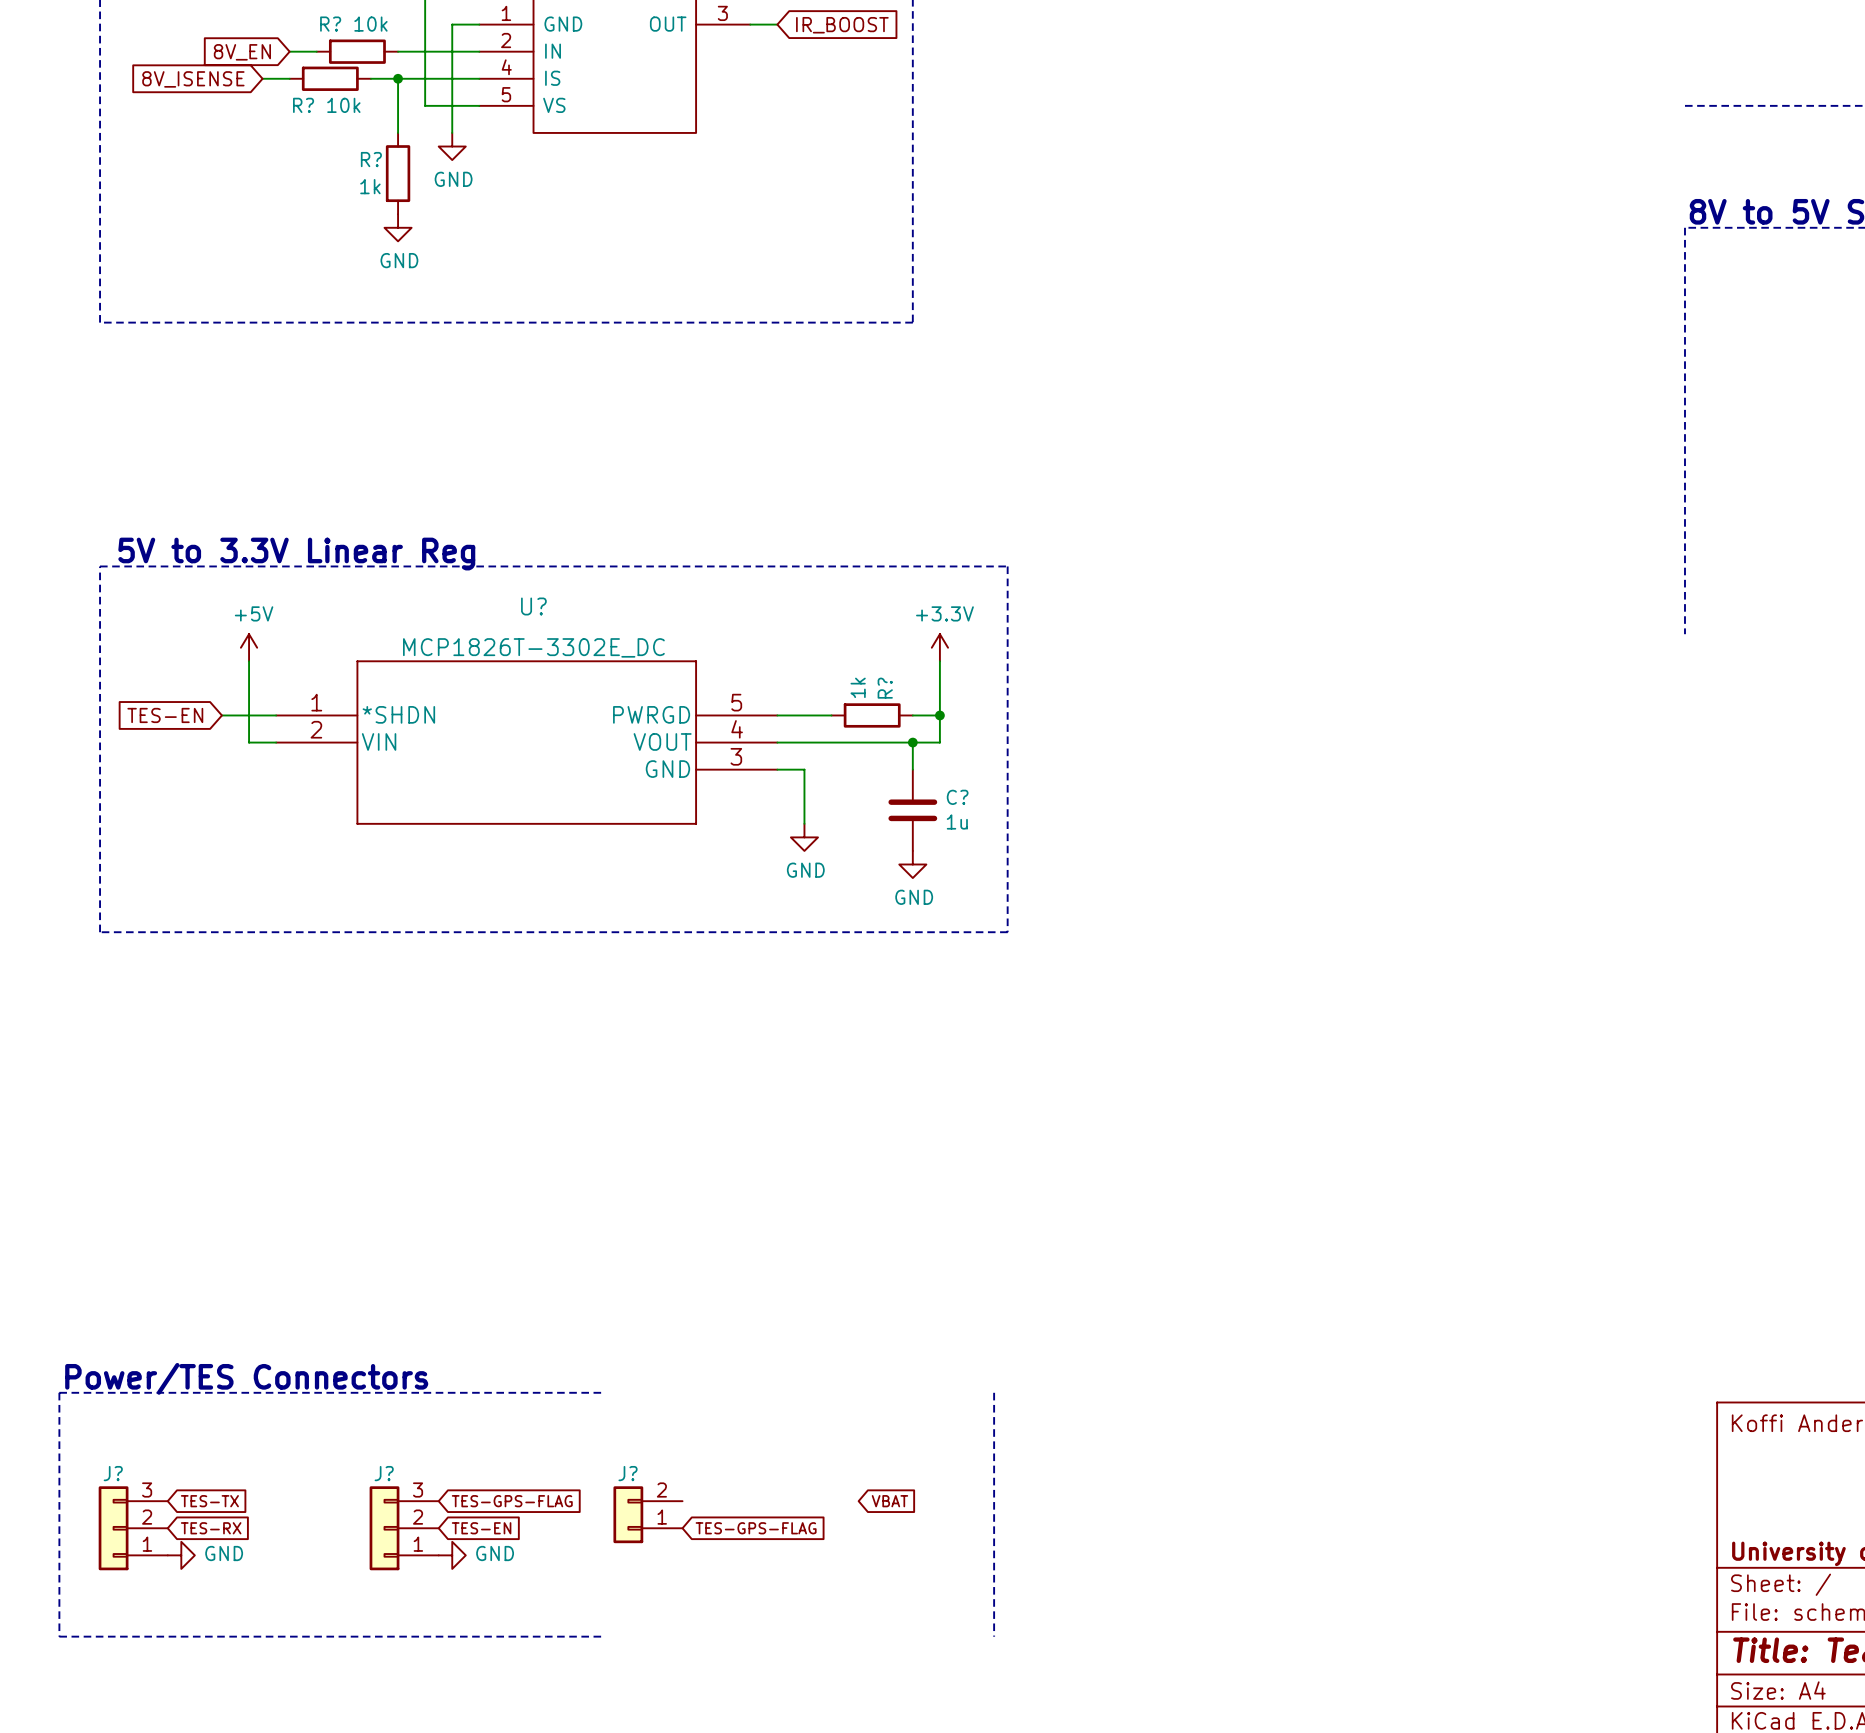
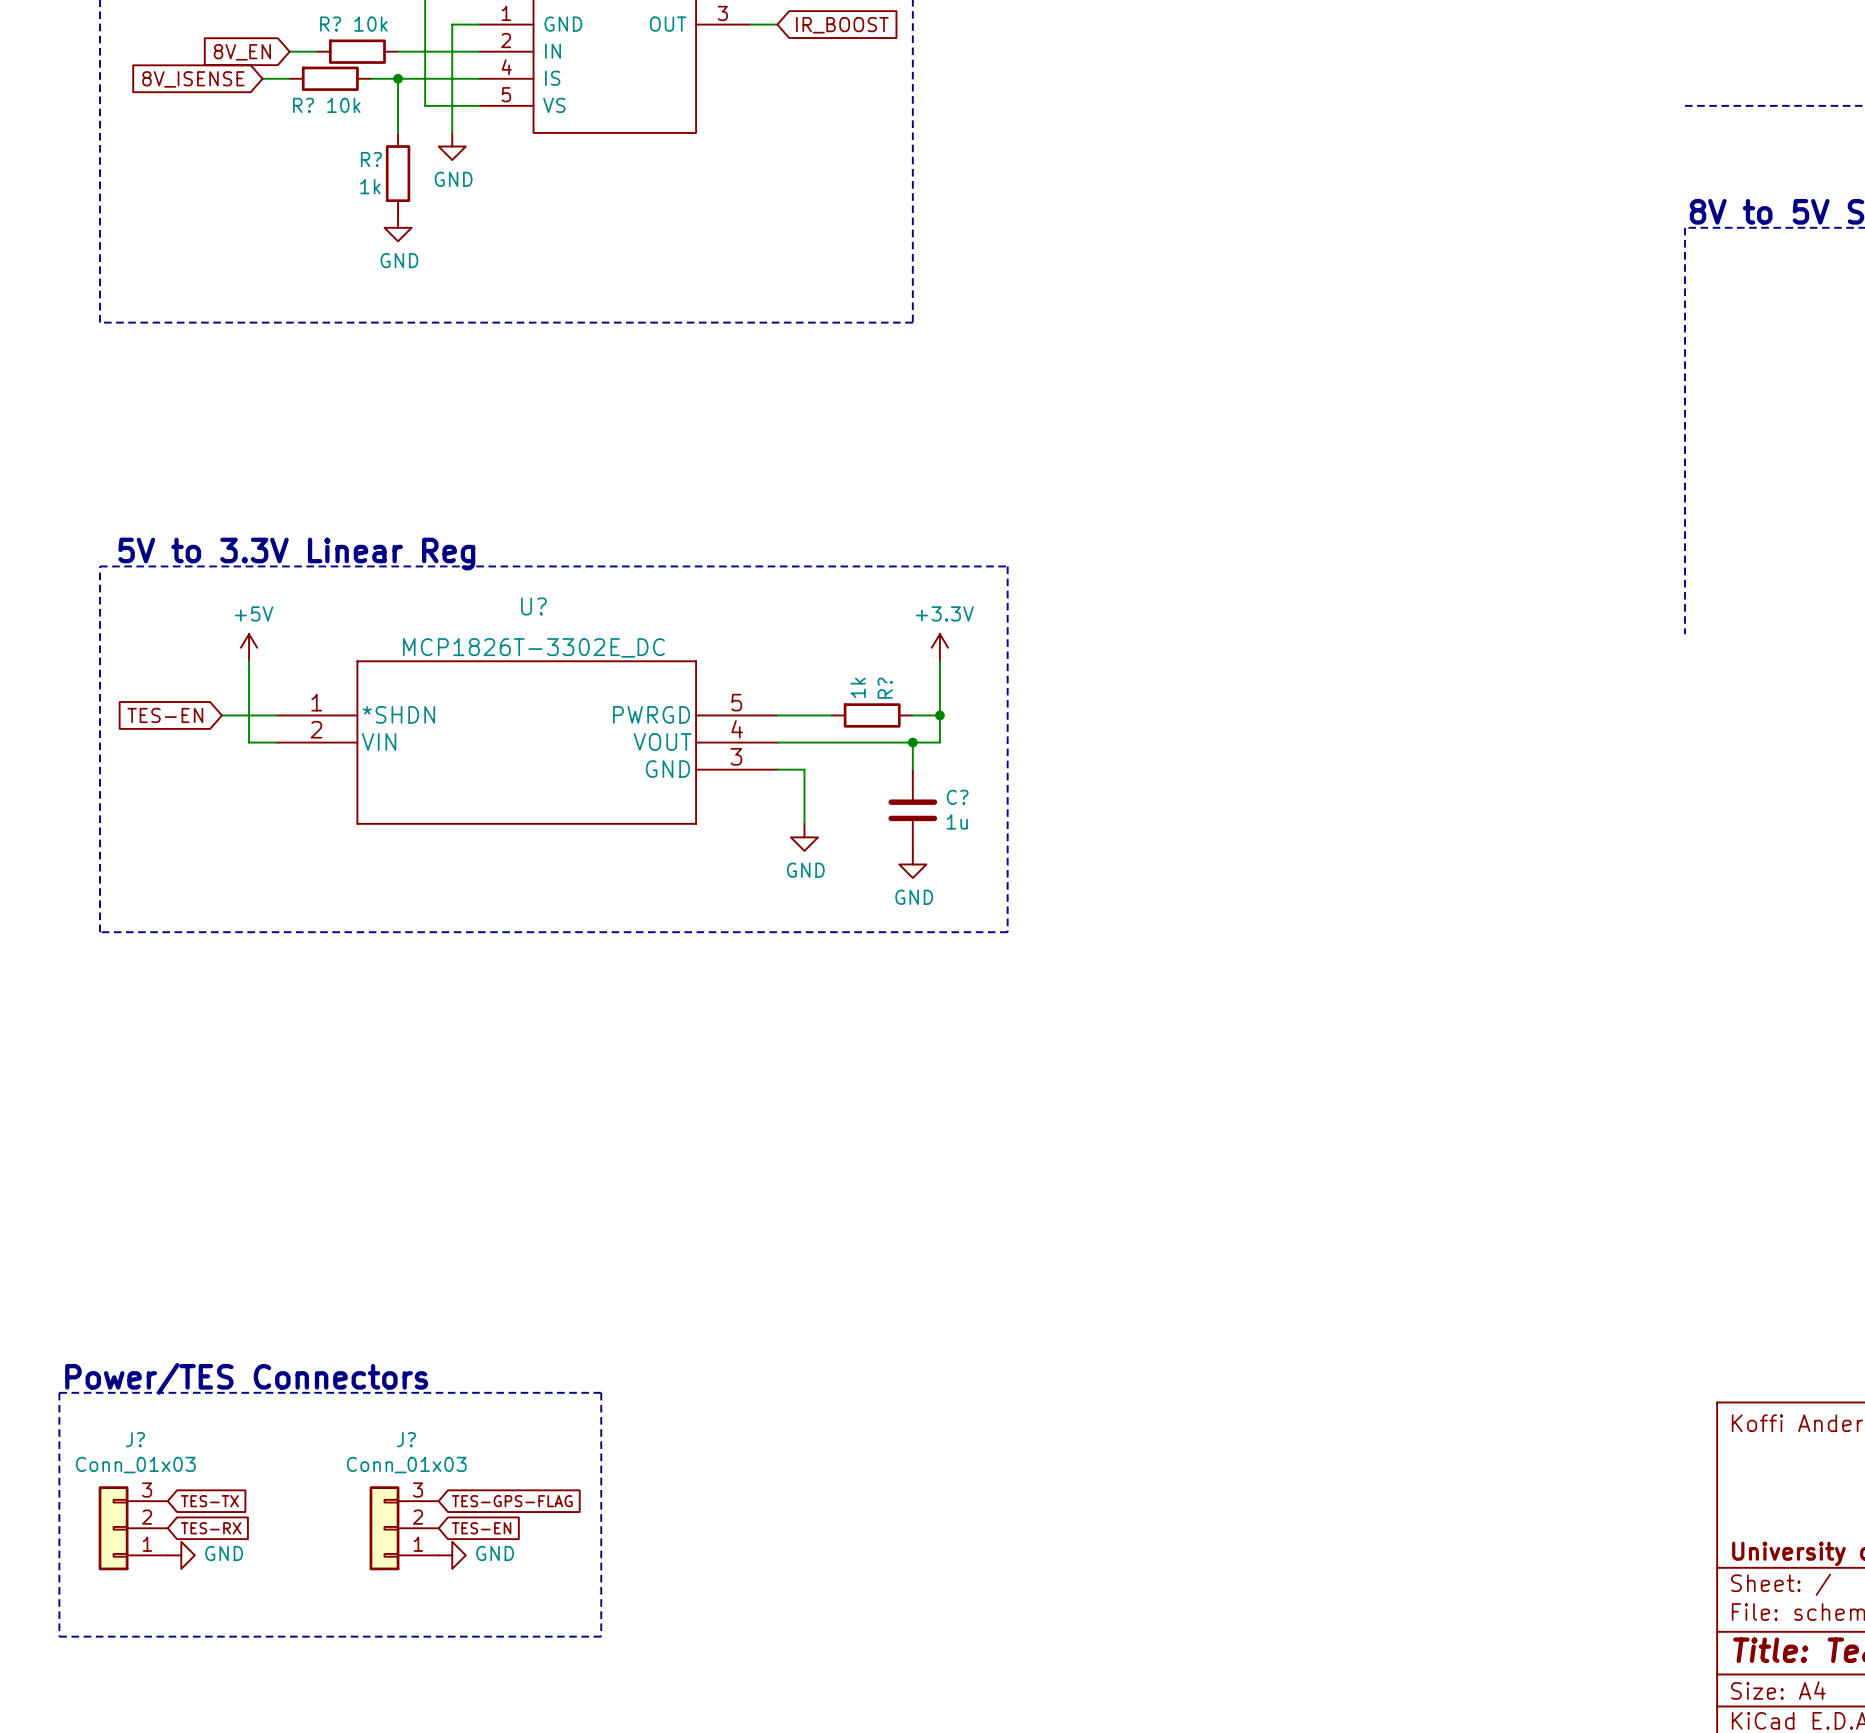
line: none -> (601, 1392) (601, 1636)
line: (994, 1392) (994, 1636) -> none
J? value: none -> Conn_01x03 (135, 1465)
J? value: none -> Conn_01x03 (406, 1465)
J? name position: J? (113, 1473) -> J? (135, 1439)
J? name position: J? (384, 1473) -> J? (406, 1439)
global label: VBAT (889, 1501) -> none
J?: (647, 1514) -> none
global label: TES-GPS-FLAG (756, 1528) -> none

